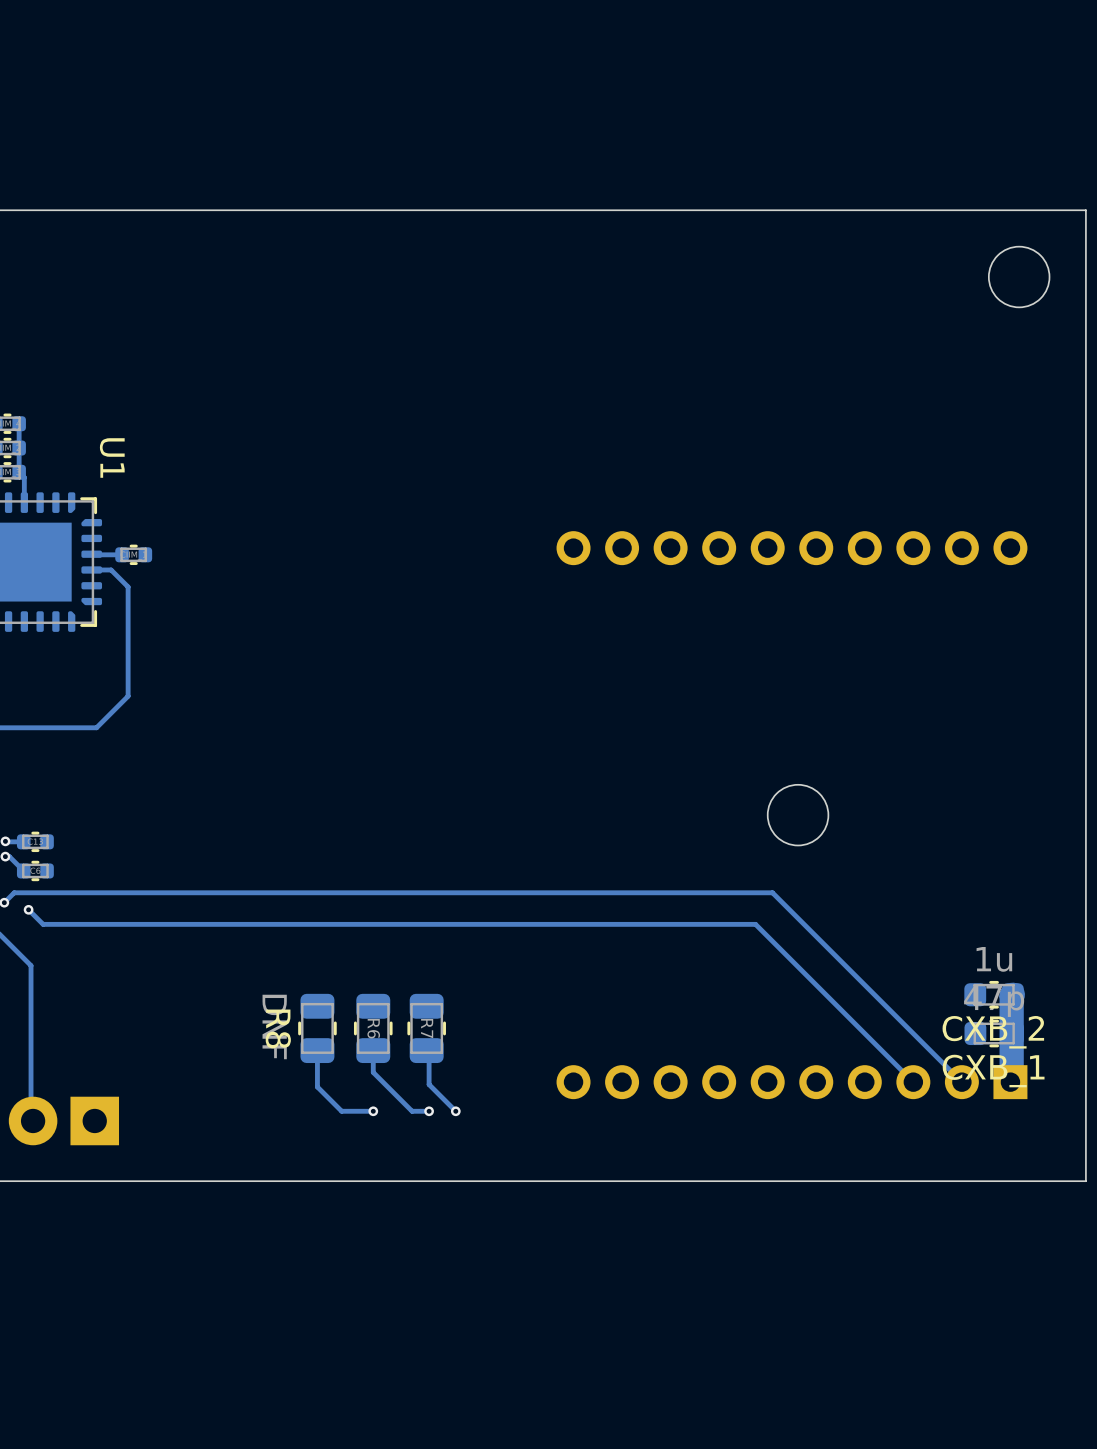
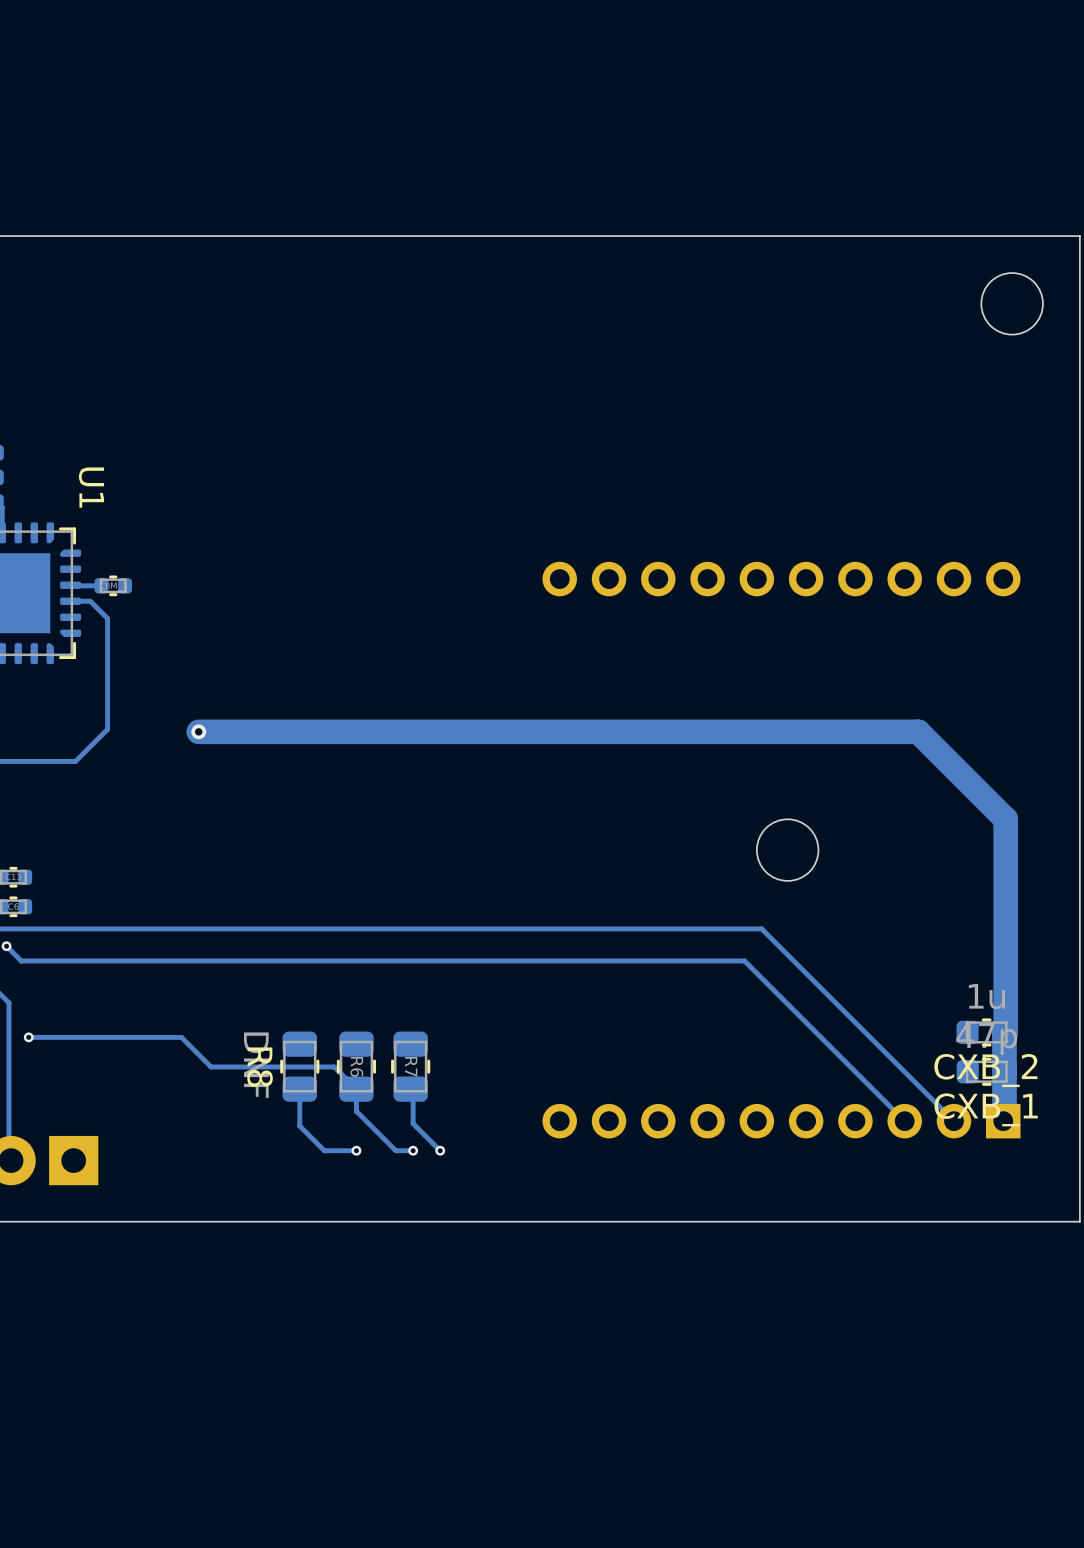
track: none -> (198, 731) (918, 731) (1005, 819) (1005, 1032)
via: none -> (198, 731)
track: none -> (28, 1037) (181, 1037) (211, 1066) (334, 1066) (356, 1089)
via: none -> (28, 1037)

